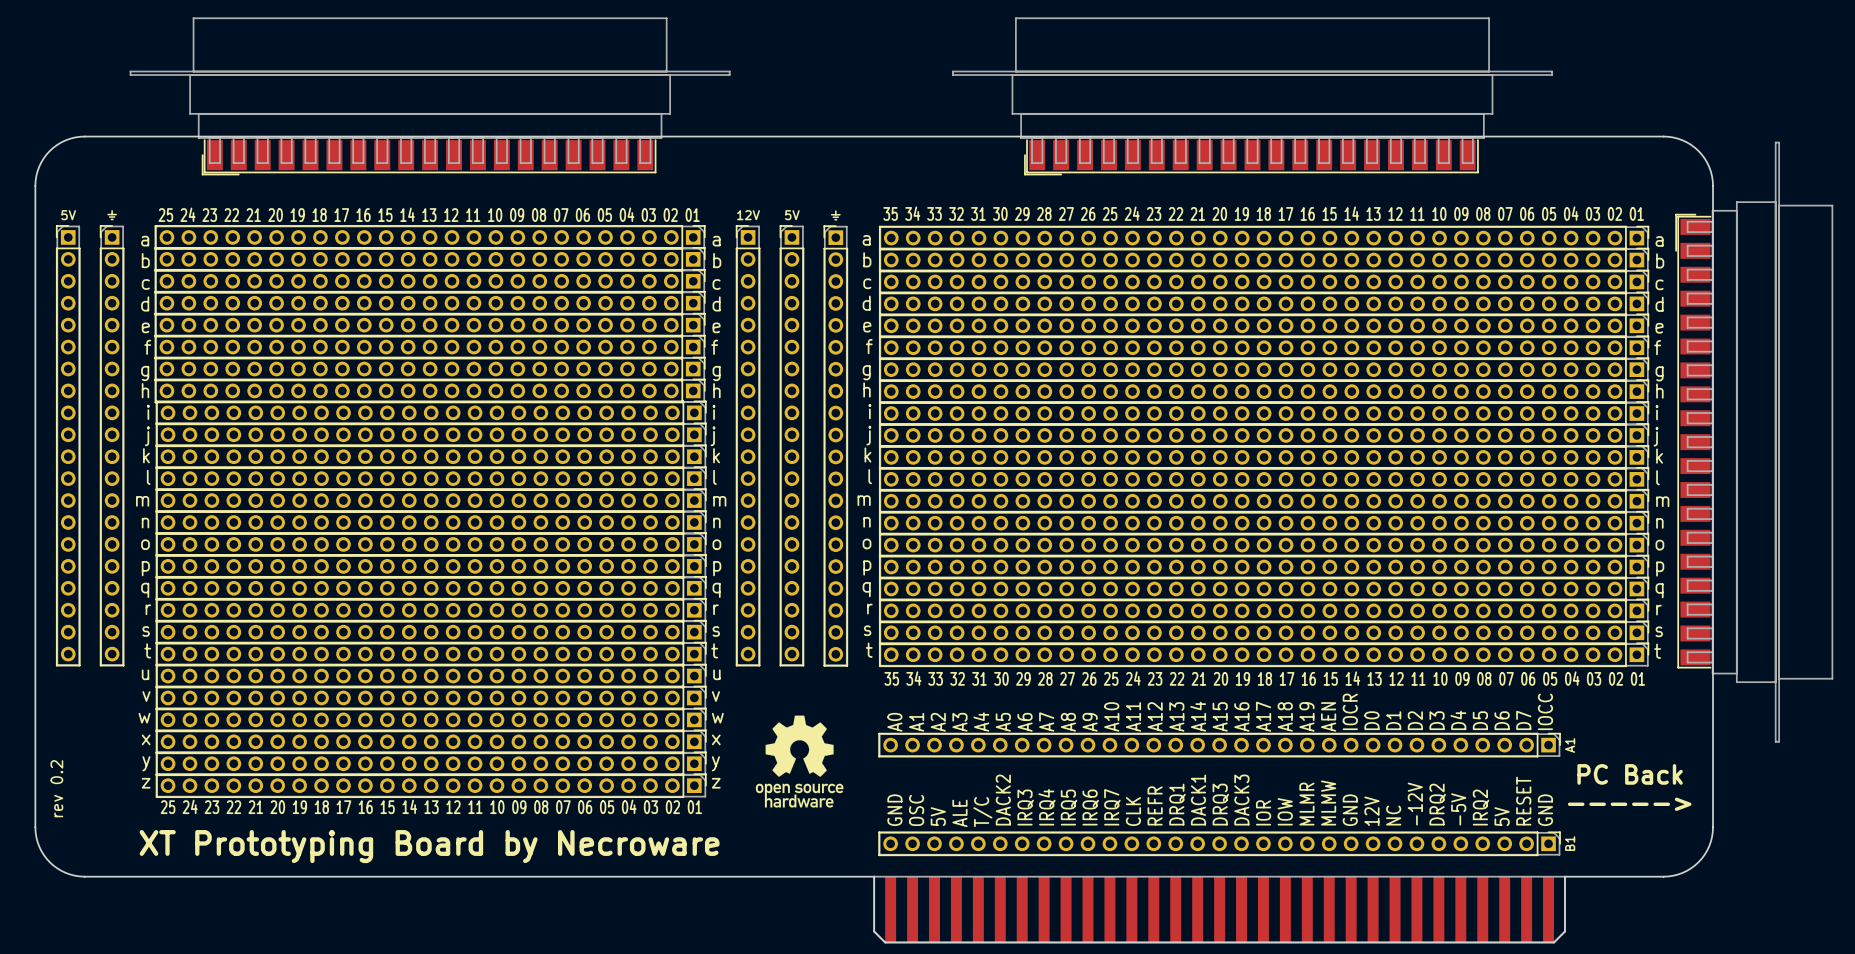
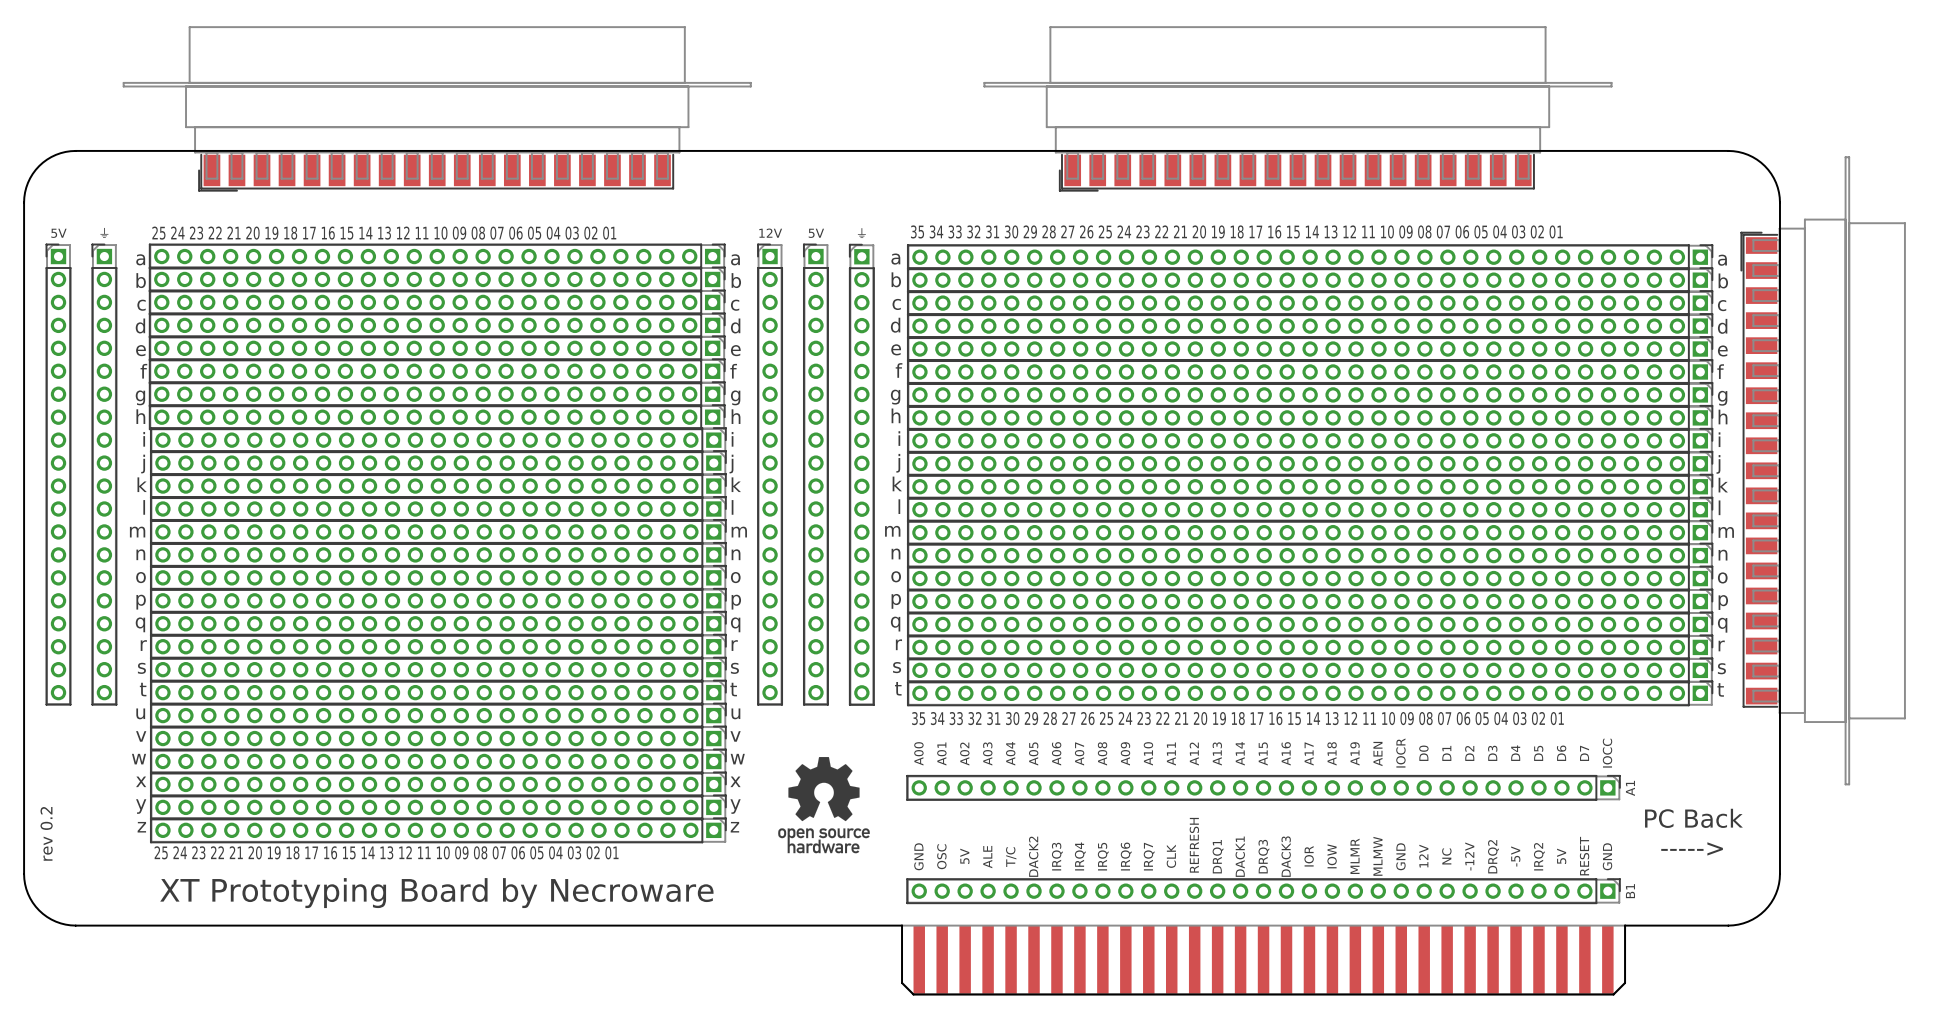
text: IOCR (1350, 711) -> none
text: IOCC (1545, 711) -> none
text: A10 (1111, 716) -> none
text: A11 (1133, 716) -> none
text: A12 (1155, 716) -> none
text: A13 (1176, 716) -> none
text: A14 (1198, 716) -> none
text: A15 (1220, 716) -> none
text: A16 (1241, 716) -> none
text: A17 (1263, 716) -> none
text: A18 (1285, 716) -> none
text: A19 (1306, 716) -> none
text: AEN (1328, 716) -> none
text: D0 (1371, 720) -> none
text: D1 (1393, 720) -> none
text: D2 (1415, 720) -> none
text: D3 (1437, 720) -> none
text: D4 (1458, 720) -> none
text: D5 (1480, 720) -> none
text: D6 (1502, 720) -> none
text: D7 (1523, 720) -> none
text: A0 (894, 722) -> none
text: A1 (916, 722) -> none
text: A2 (938, 722) -> none
text: A3 (959, 722) -> none
text: A4 (981, 722) -> none
text: A5 (1003, 722) -> none
text: A6 (1025, 722) -> none
text: A7 (1046, 722) -> none
text: A8 (1068, 722) -> none
text: A9 (1090, 722) -> none
part footprint: [878, 733, 1561, 758] -> [906, 775, 1621, 801]
text: DACK2 (1003, 800) -> none
text: DACK1 (1198, 800) -> none
text: DACK3 (1241, 800) -> none
text: RESET (1523, 801) -> none
text: MLMW (1328, 802) -> none
text: DRQ1 (1177, 804) -> none
text: DRQ3 (1220, 804) -> none
text: MLMR (1306, 804) -> none
text: -12V (1415, 804) -> none
text: DRQ2 (1437, 804) -> none
text: REFR (1155, 805) -> none
text: IRQ3 (1025, 807) -> none
text: IRQ4 (1047, 807) -> none
text: IRQ5 (1069, 807) -> none
text: IRQ6 (1090, 807) -> none
text: IRQ7 (1112, 807) -> none
text: IRQ2 (1481, 807) -> none
text: -5V (1458, 809) -> none
text: GND (894, 810) -> none
text: OSC (916, 810) -> none
text: GND (1350, 810) -> none
text: GND (1545, 810) -> none
text: CLK (1133, 811) -> none
text: IOW (1285, 811) -> none
text: 12V (1371, 811) -> none
text: T/C (982, 812) -> none
text: IOR (1263, 812) -> none
text: ALE (959, 813) -> none
text: NC (1393, 815) -> none
text: 5V (938, 816) -> none
text: 5V (1502, 816) -> none
part footprint: [878, 831, 1561, 856] -> [906, 878, 1621, 904]

